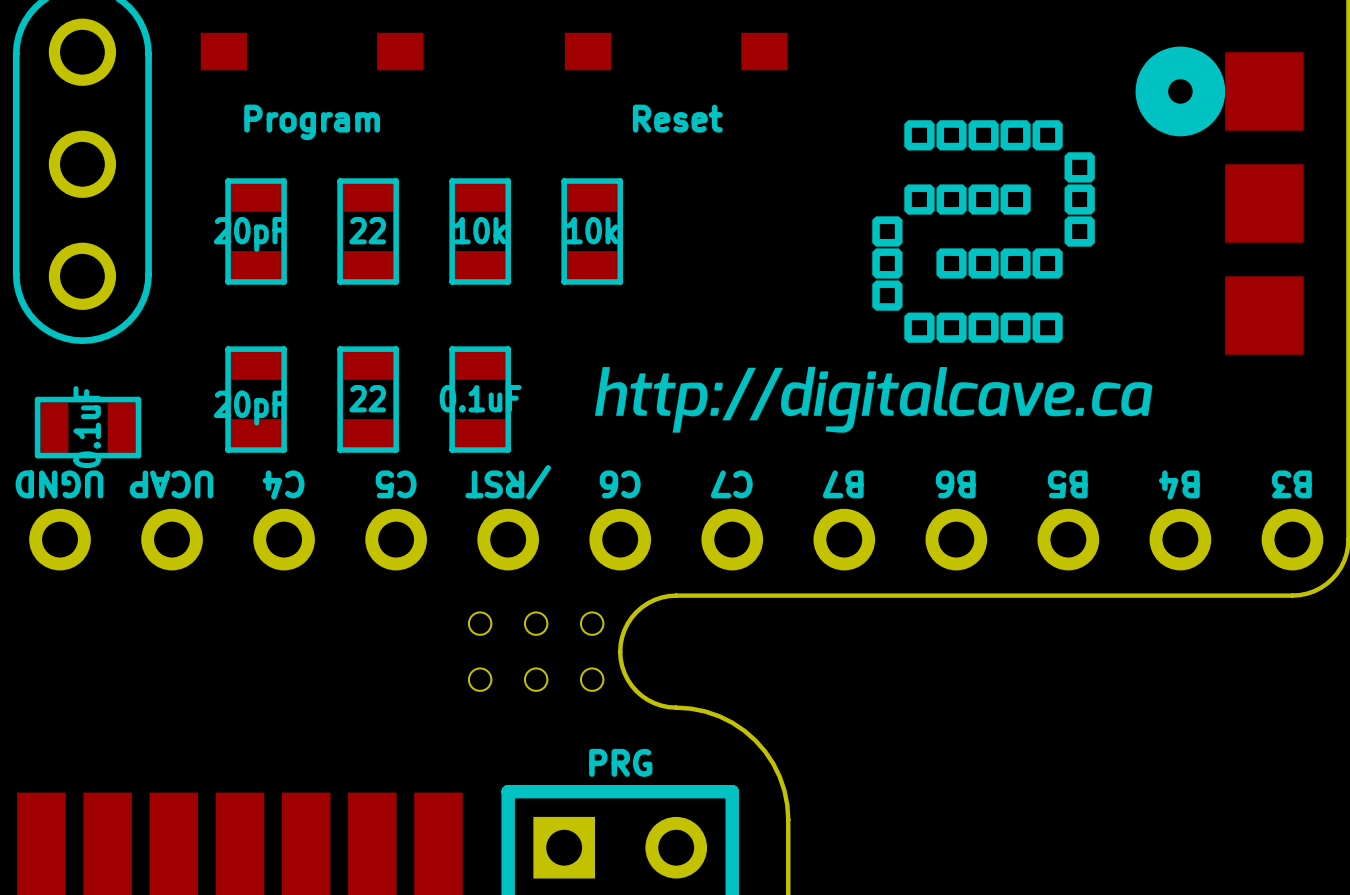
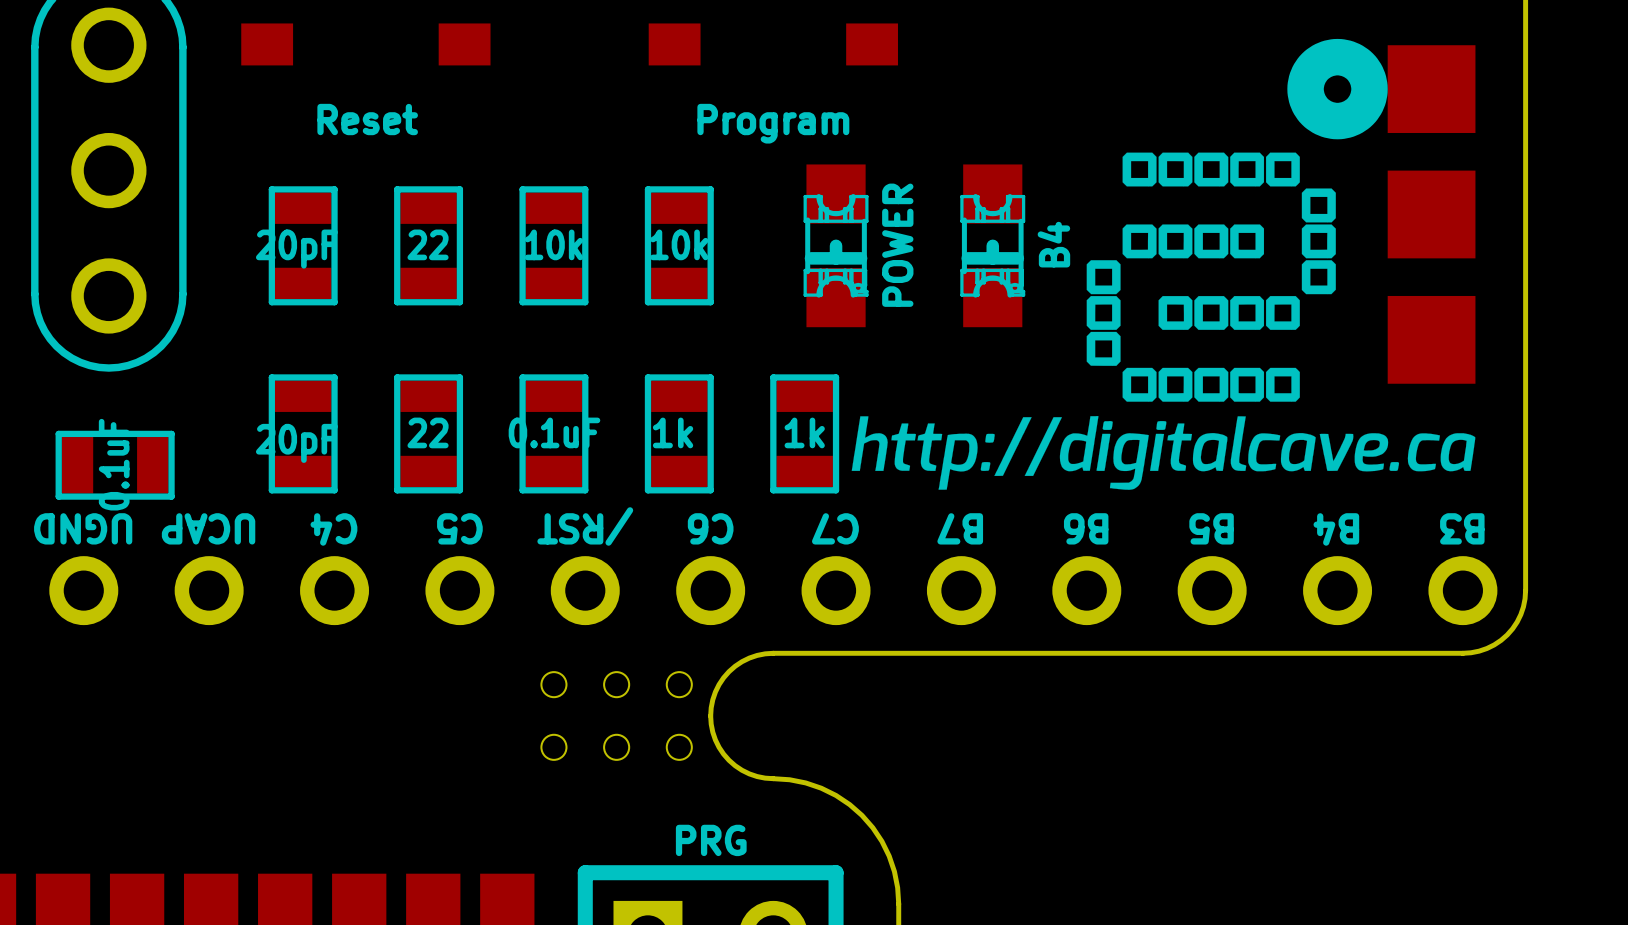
text: Reset (677, 118) -> Program (773, 123)
text: Program (312, 122) -> Reset (367, 119)
part: none -> POWER (836, 245)
part: none -> B4 (992, 245)
drawing position: (983, 231) -> (1211, 277)
part: none -> 1k (679, 433)
part: none -> 1k (804, 433)
drawing position: (873, 399) -> (1163, 452)

